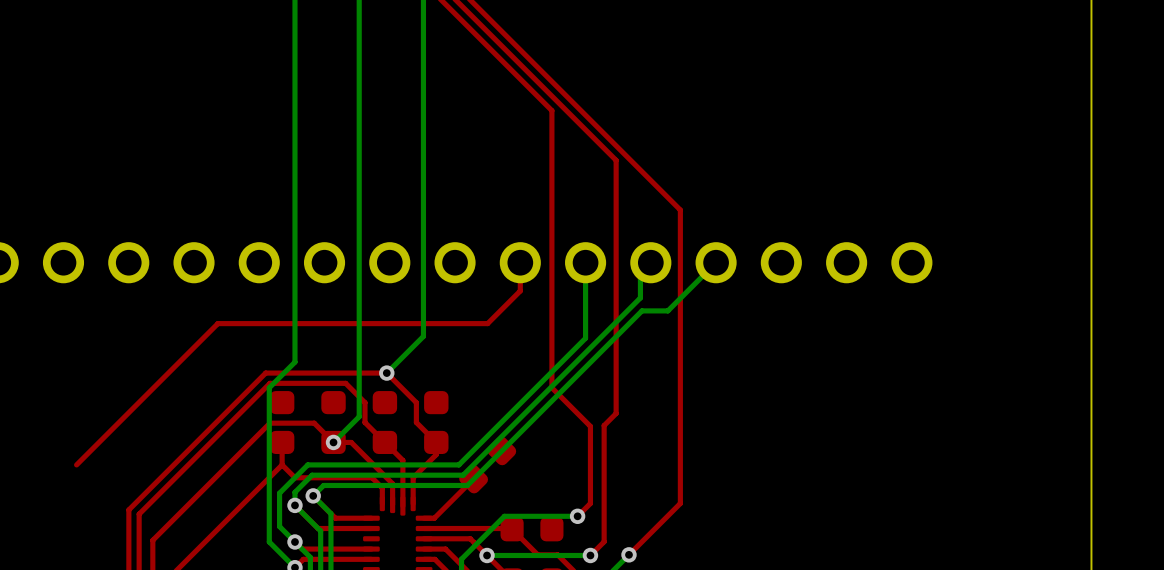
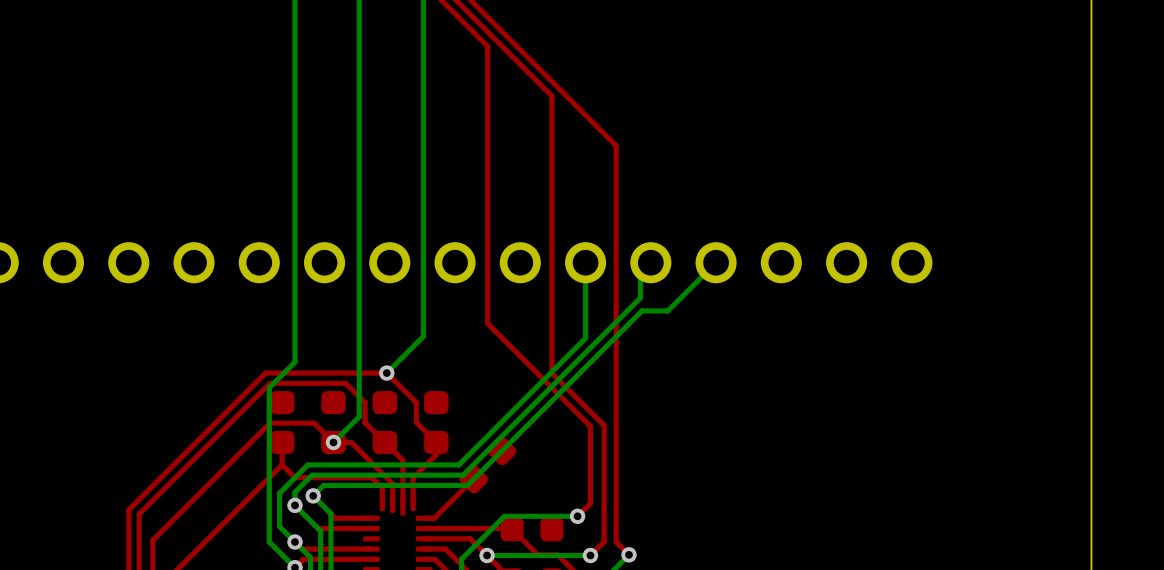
top track: (487, 46) (551, 110) -> (551, 96) (551, 110)
top track: none -> (487, 46) (487, 323) (551, 387)
top track: (551, 96) (616, 160) -> (616, 145) (616, 160)
top track: (616, 145) (680, 210) (680, 503) (628, 554) -> none
top track: (520, 262) (520, 290) (487, 323) (217, 323) (76, 464) -> none
top track: (551, 373) (551, 387) -> (551, 373) (604, 425)
top track: (616, 413) (604, 425) -> (616, 413) (616, 542) (628, 554)

